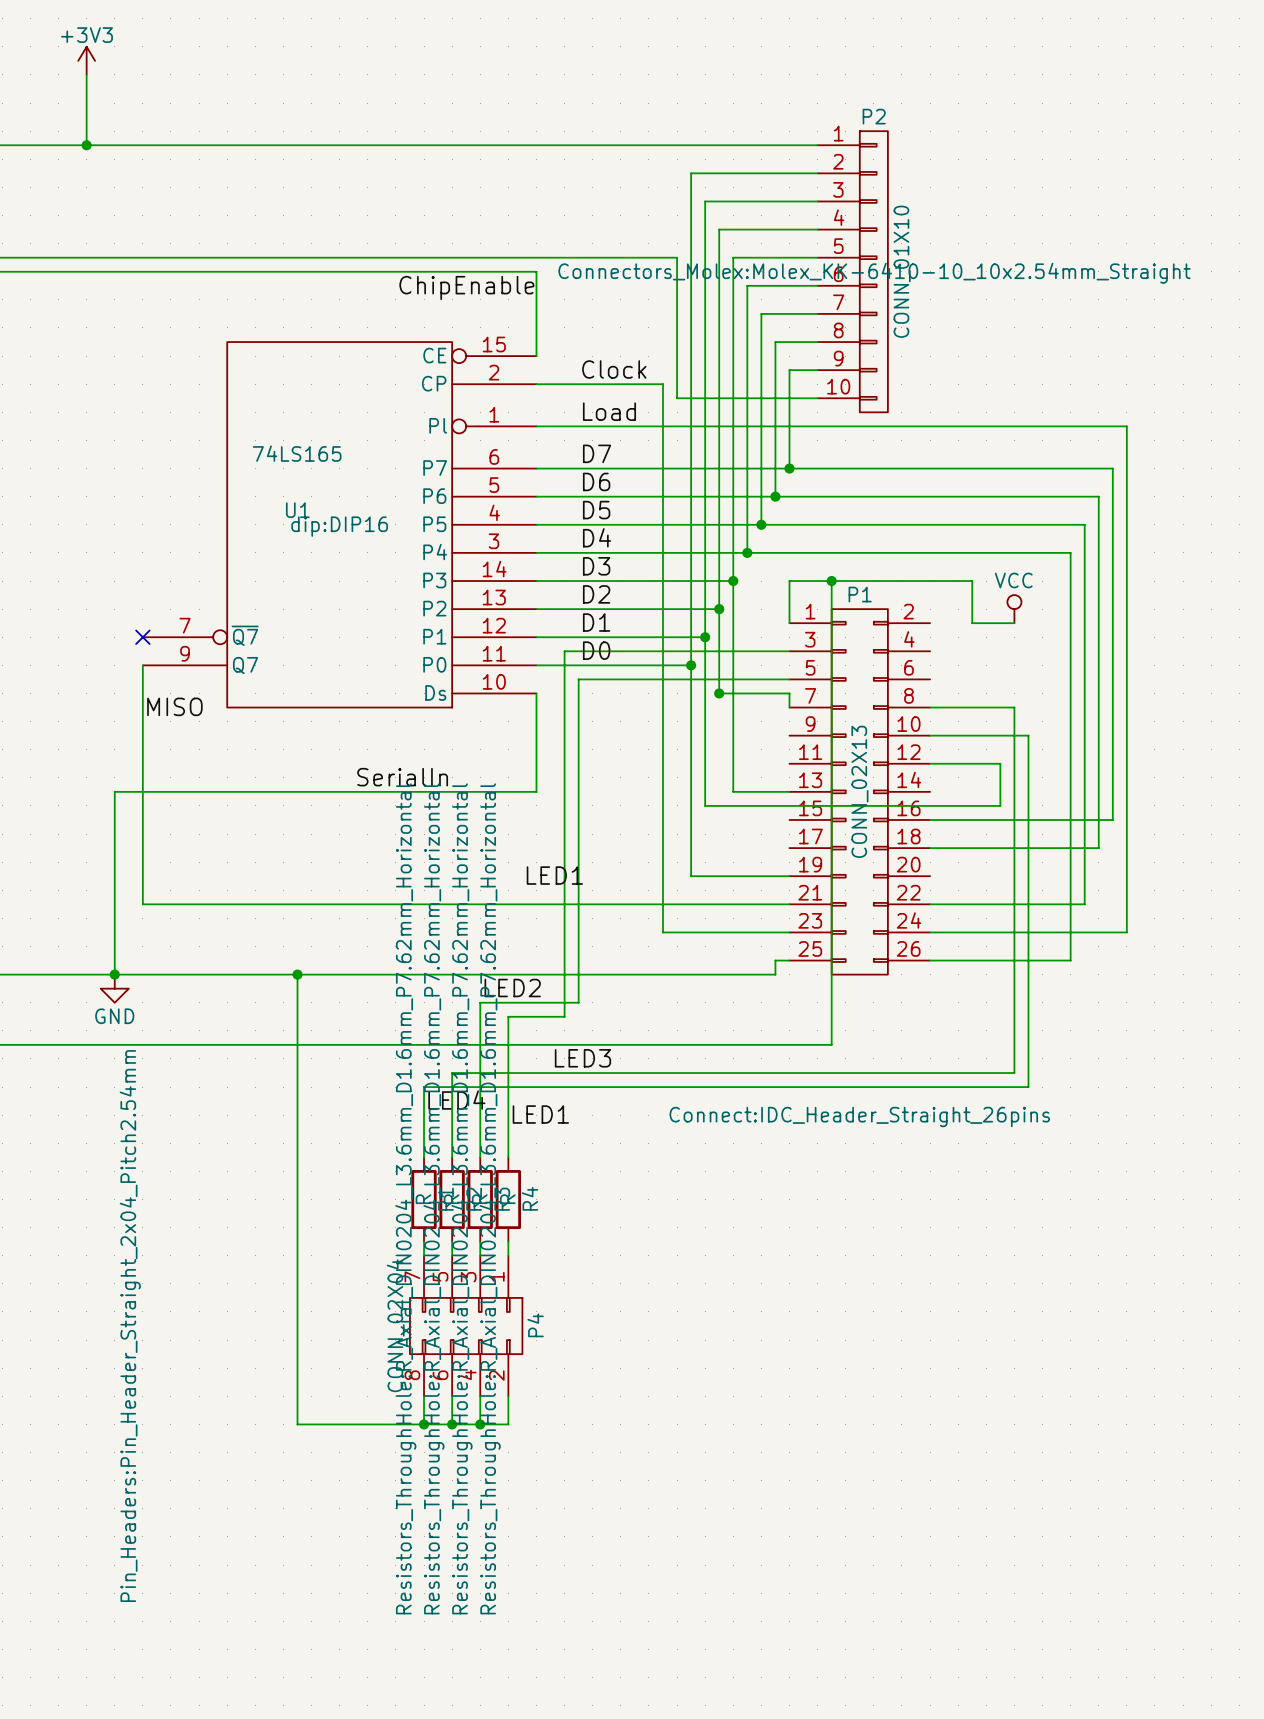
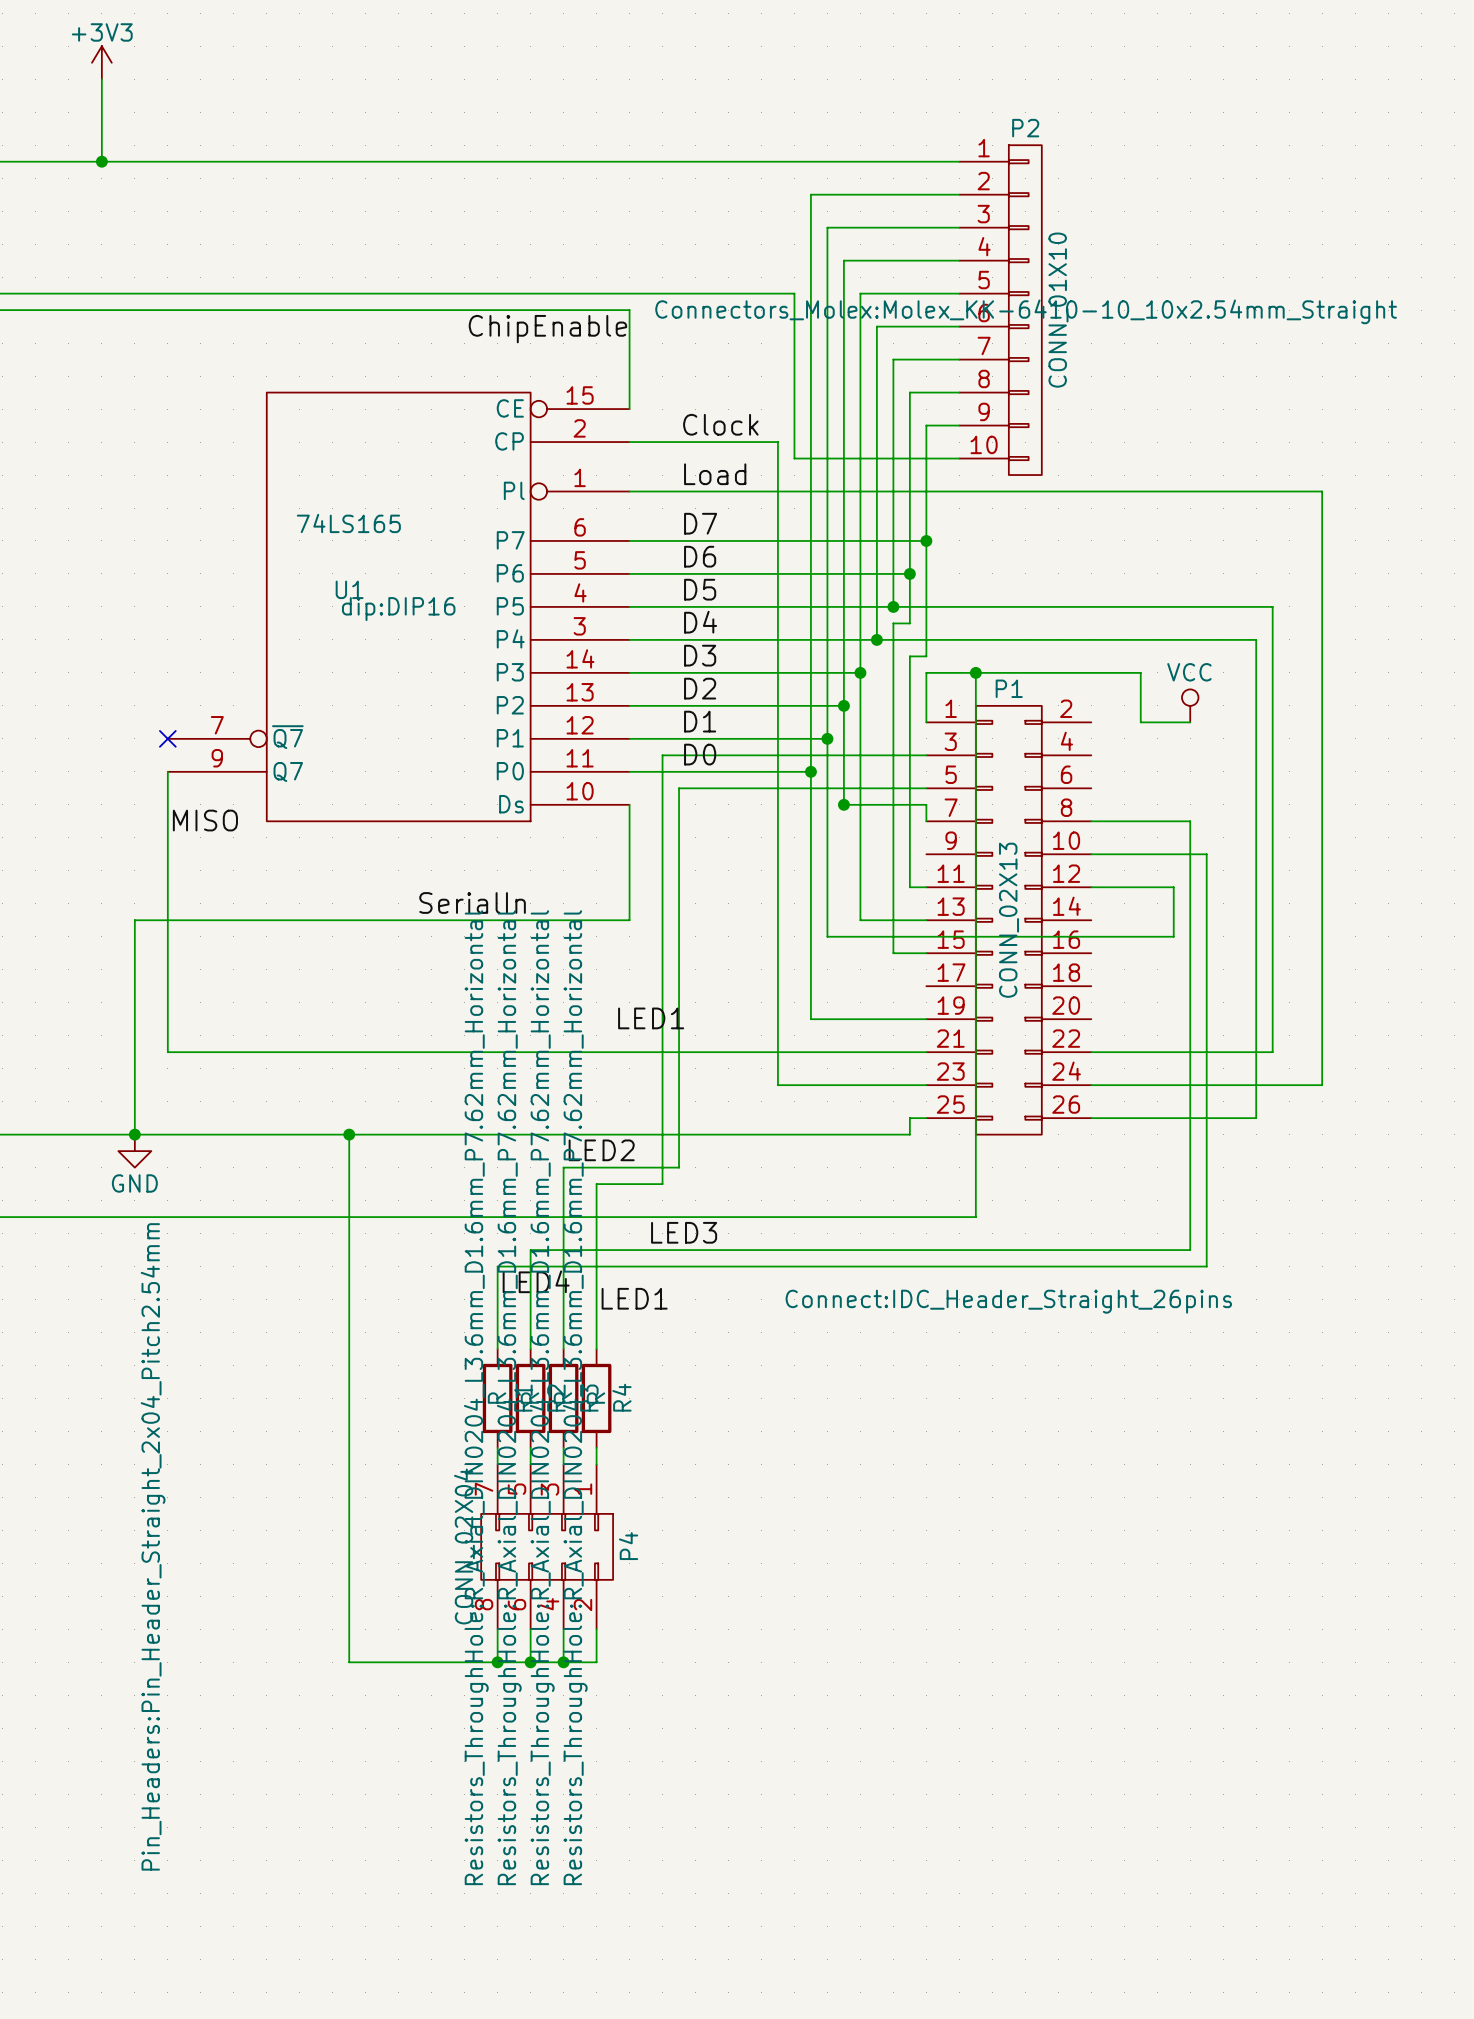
wire: (789, 468) (1112, 468) (1112, 819) (930, 819) -> (926, 540) (926, 656) (909, 656) (909, 887) (926, 887)
wire: (775, 496) (1098, 496) (1098, 848) (930, 848) -> (909, 573) (909, 623) (893, 623) (893, 953) (926, 953)

